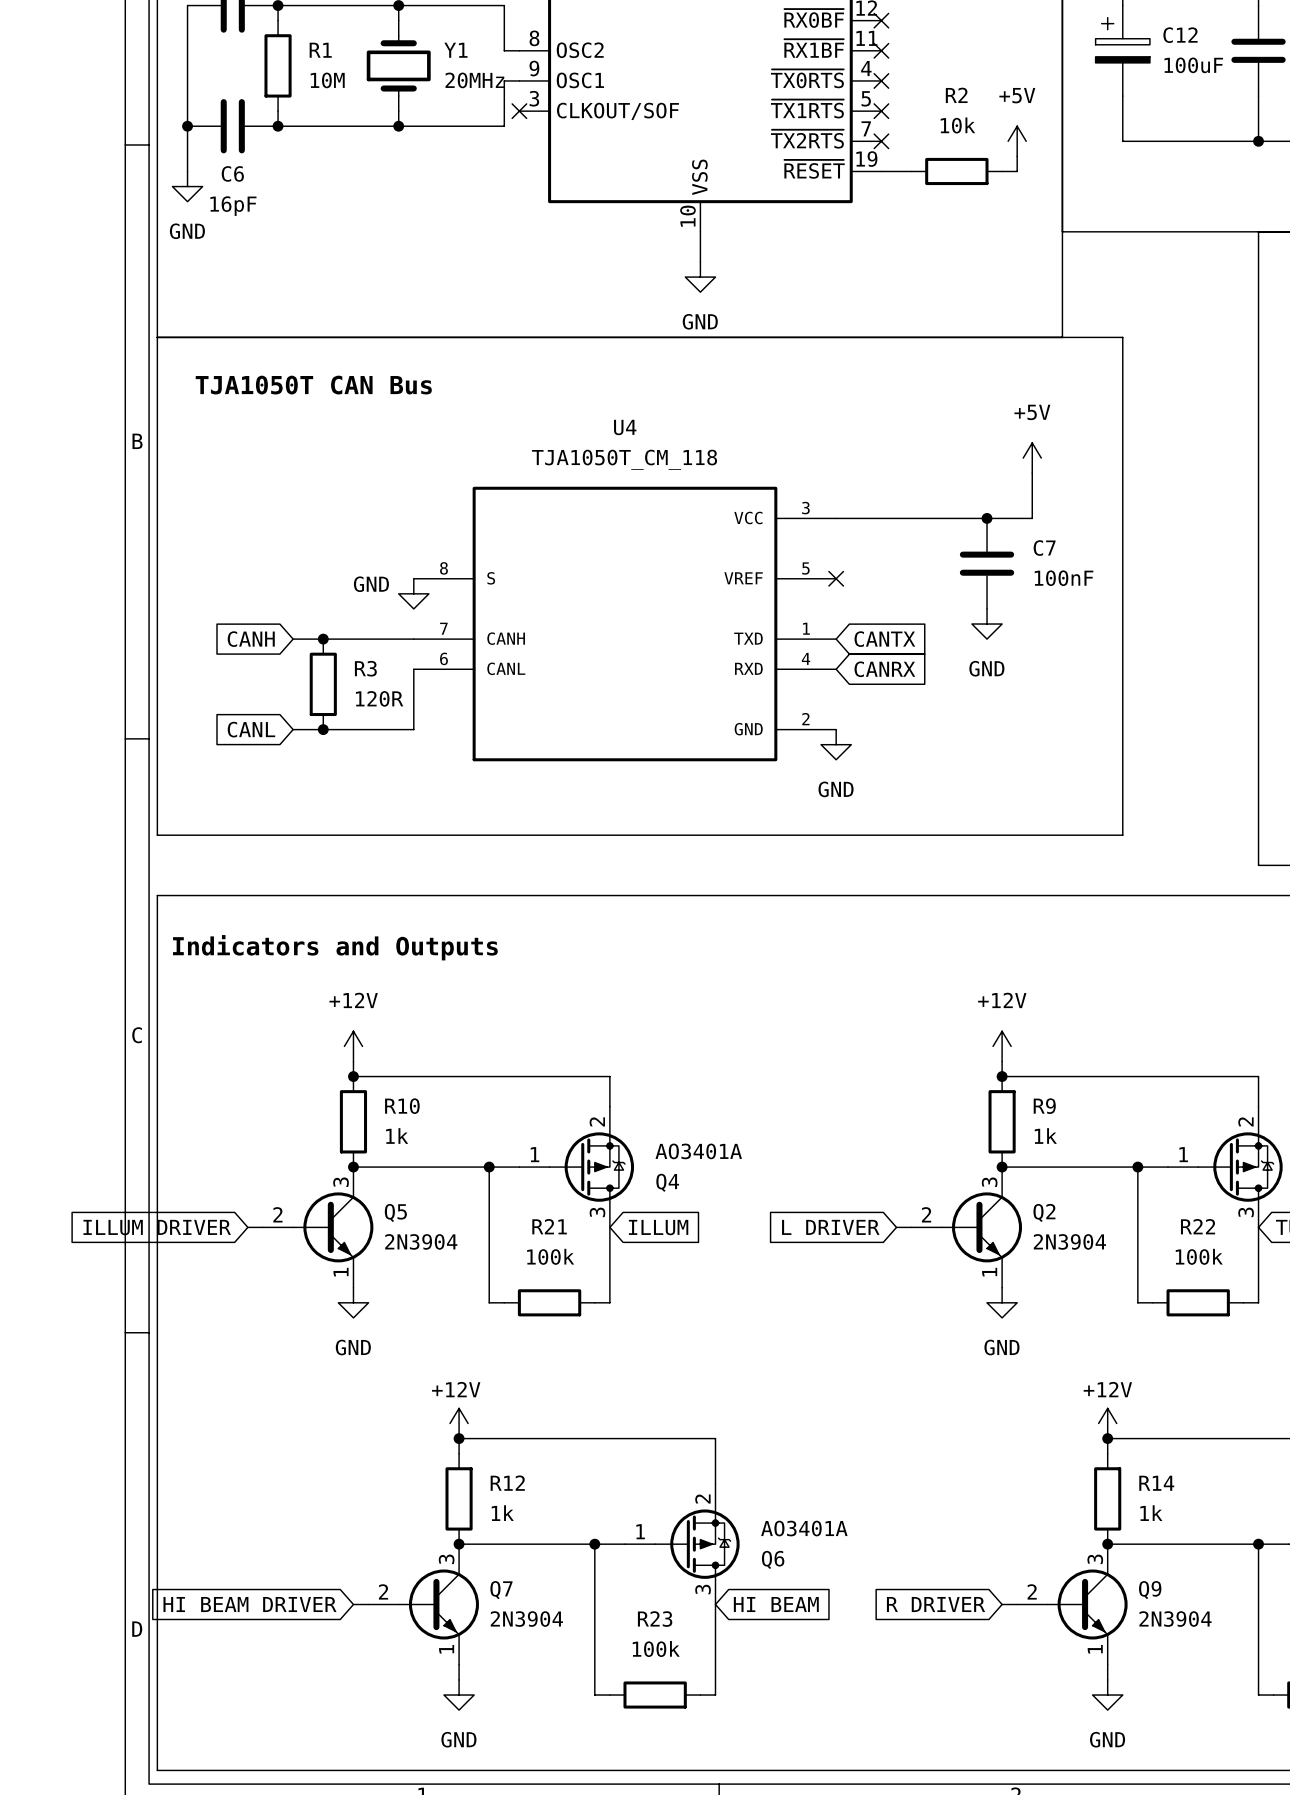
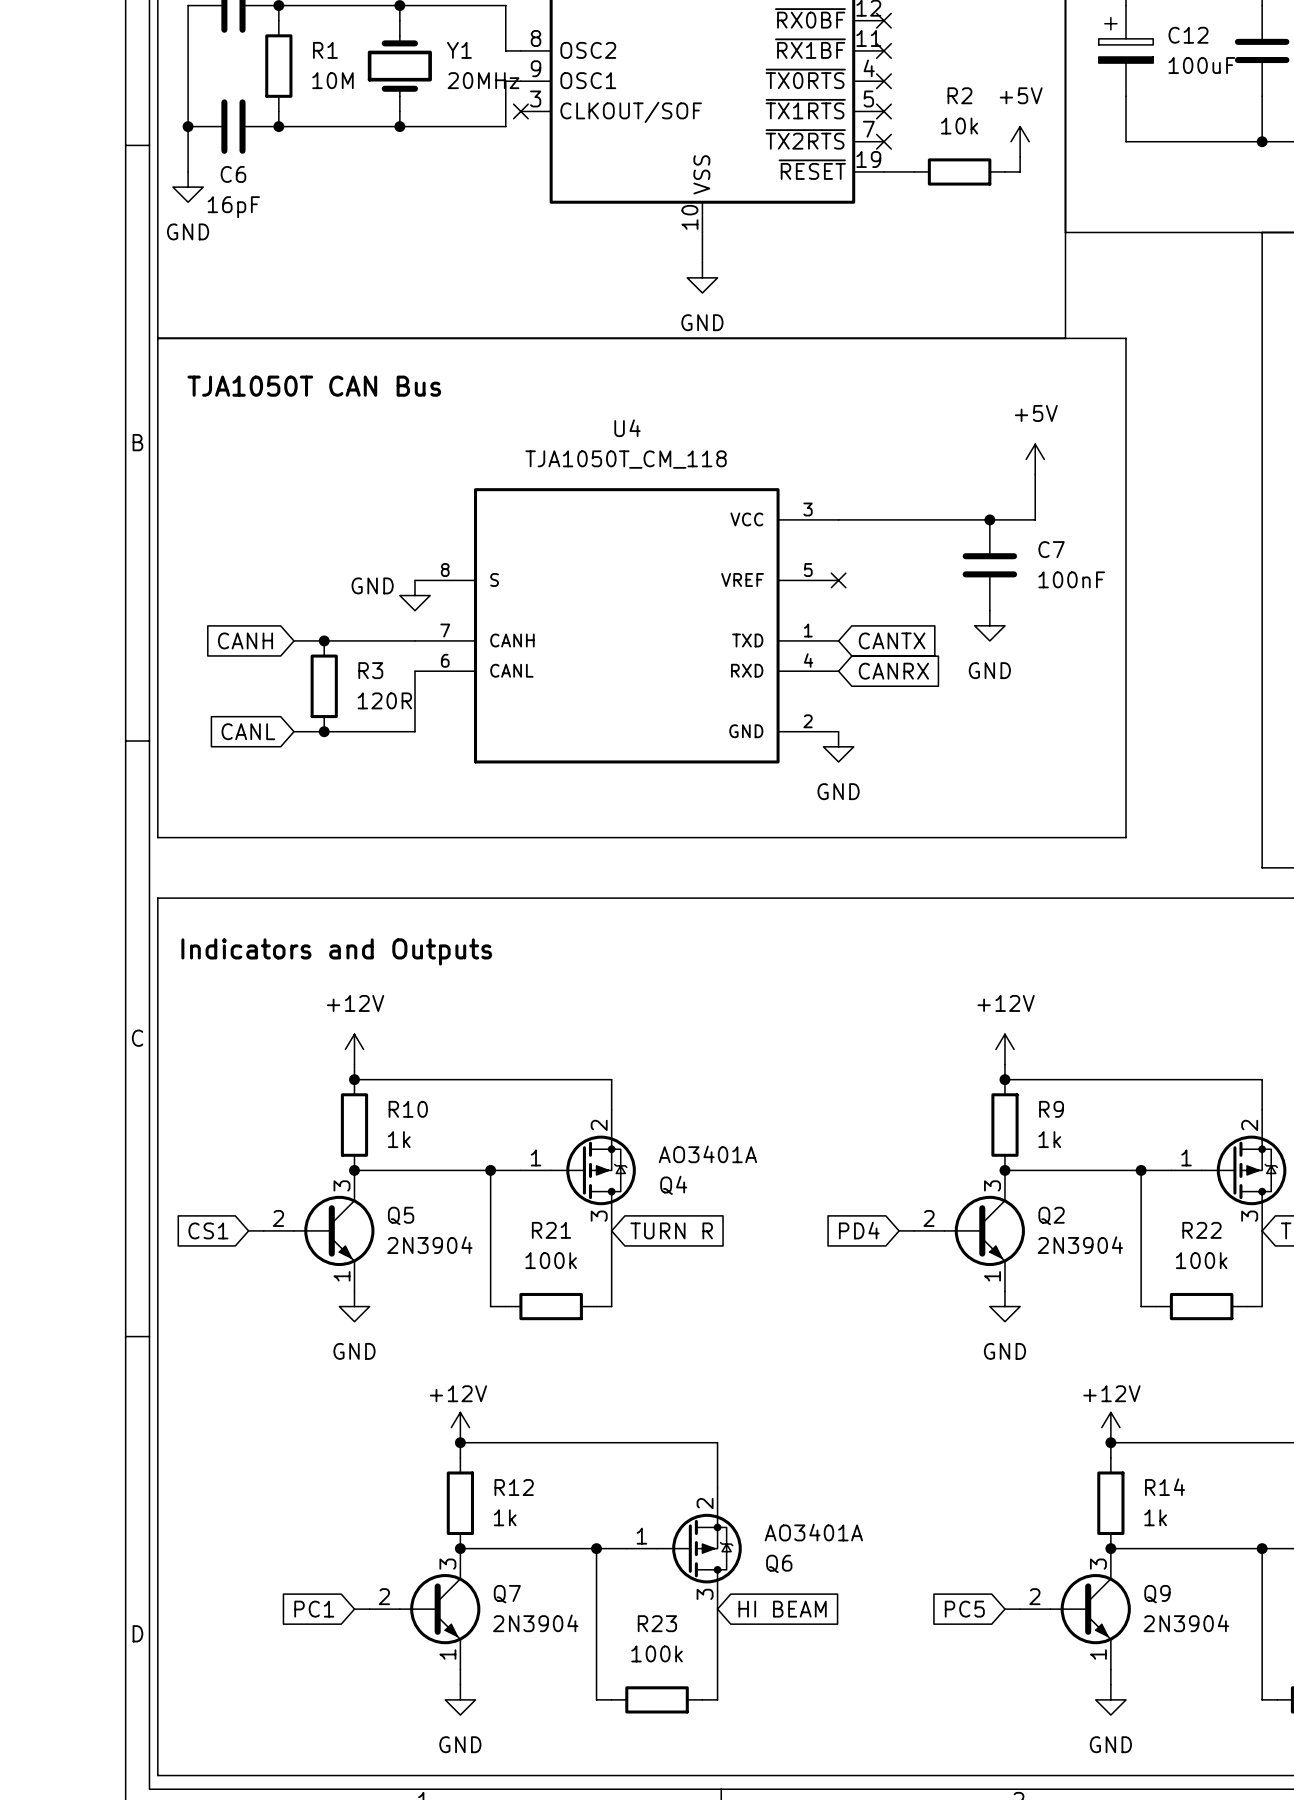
global label: ILLUM DRIVER (157, 1227) -> CS1 (208, 1230)
global label: ILLUM (658, 1227) -> TURN R (671, 1230)
global label: L DRIVER (830, 1227) -> PD4 (859, 1230)
global label: HI BEAM DRIVER (249, 1604) -> PC1 (314, 1609)
global label: R DRIVER (936, 1604) -> PC5 (964, 1609)

